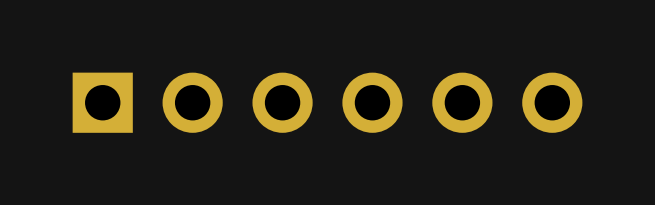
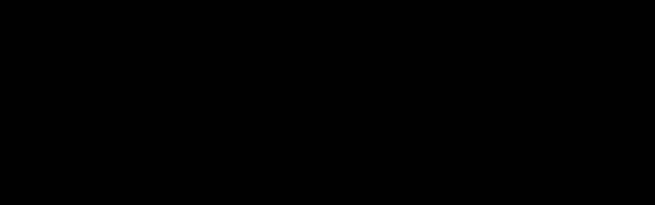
part: (327, 102) -> none

